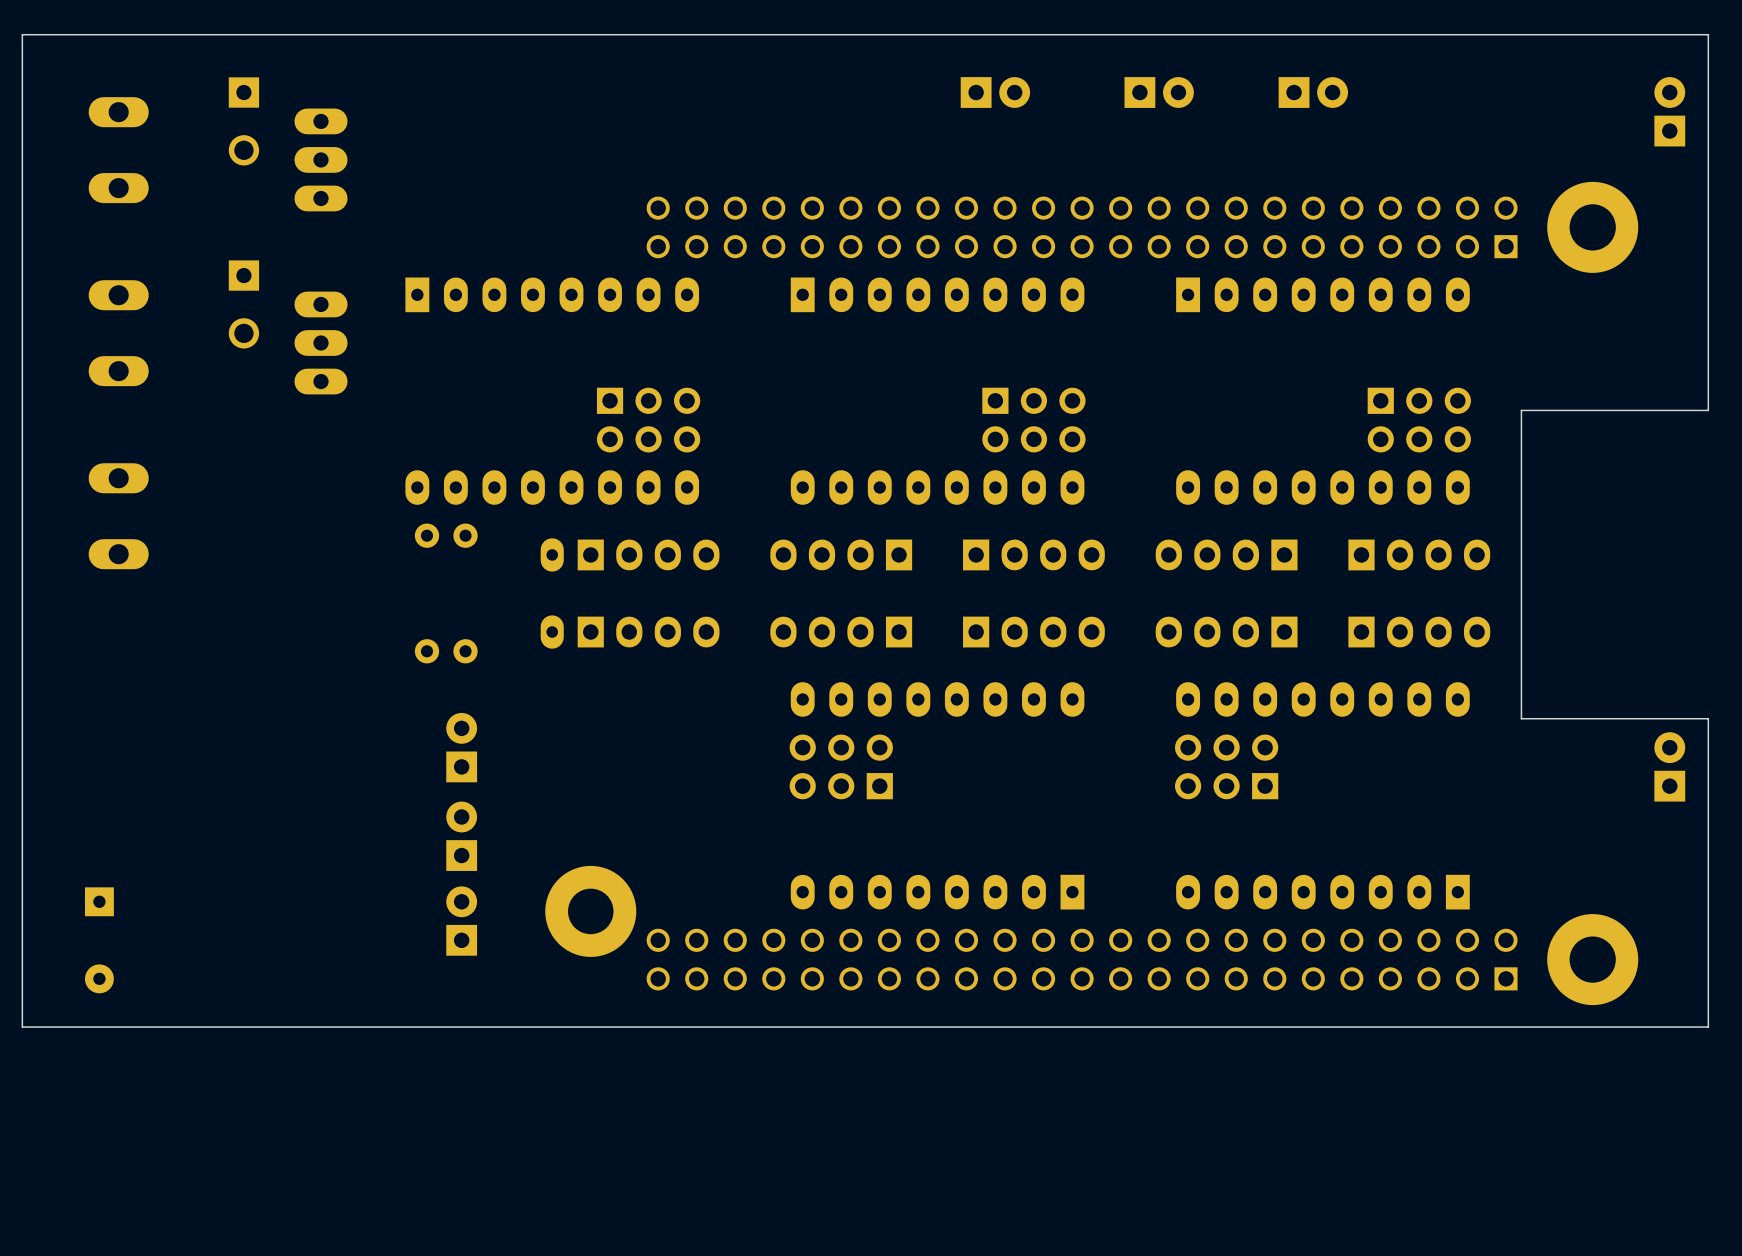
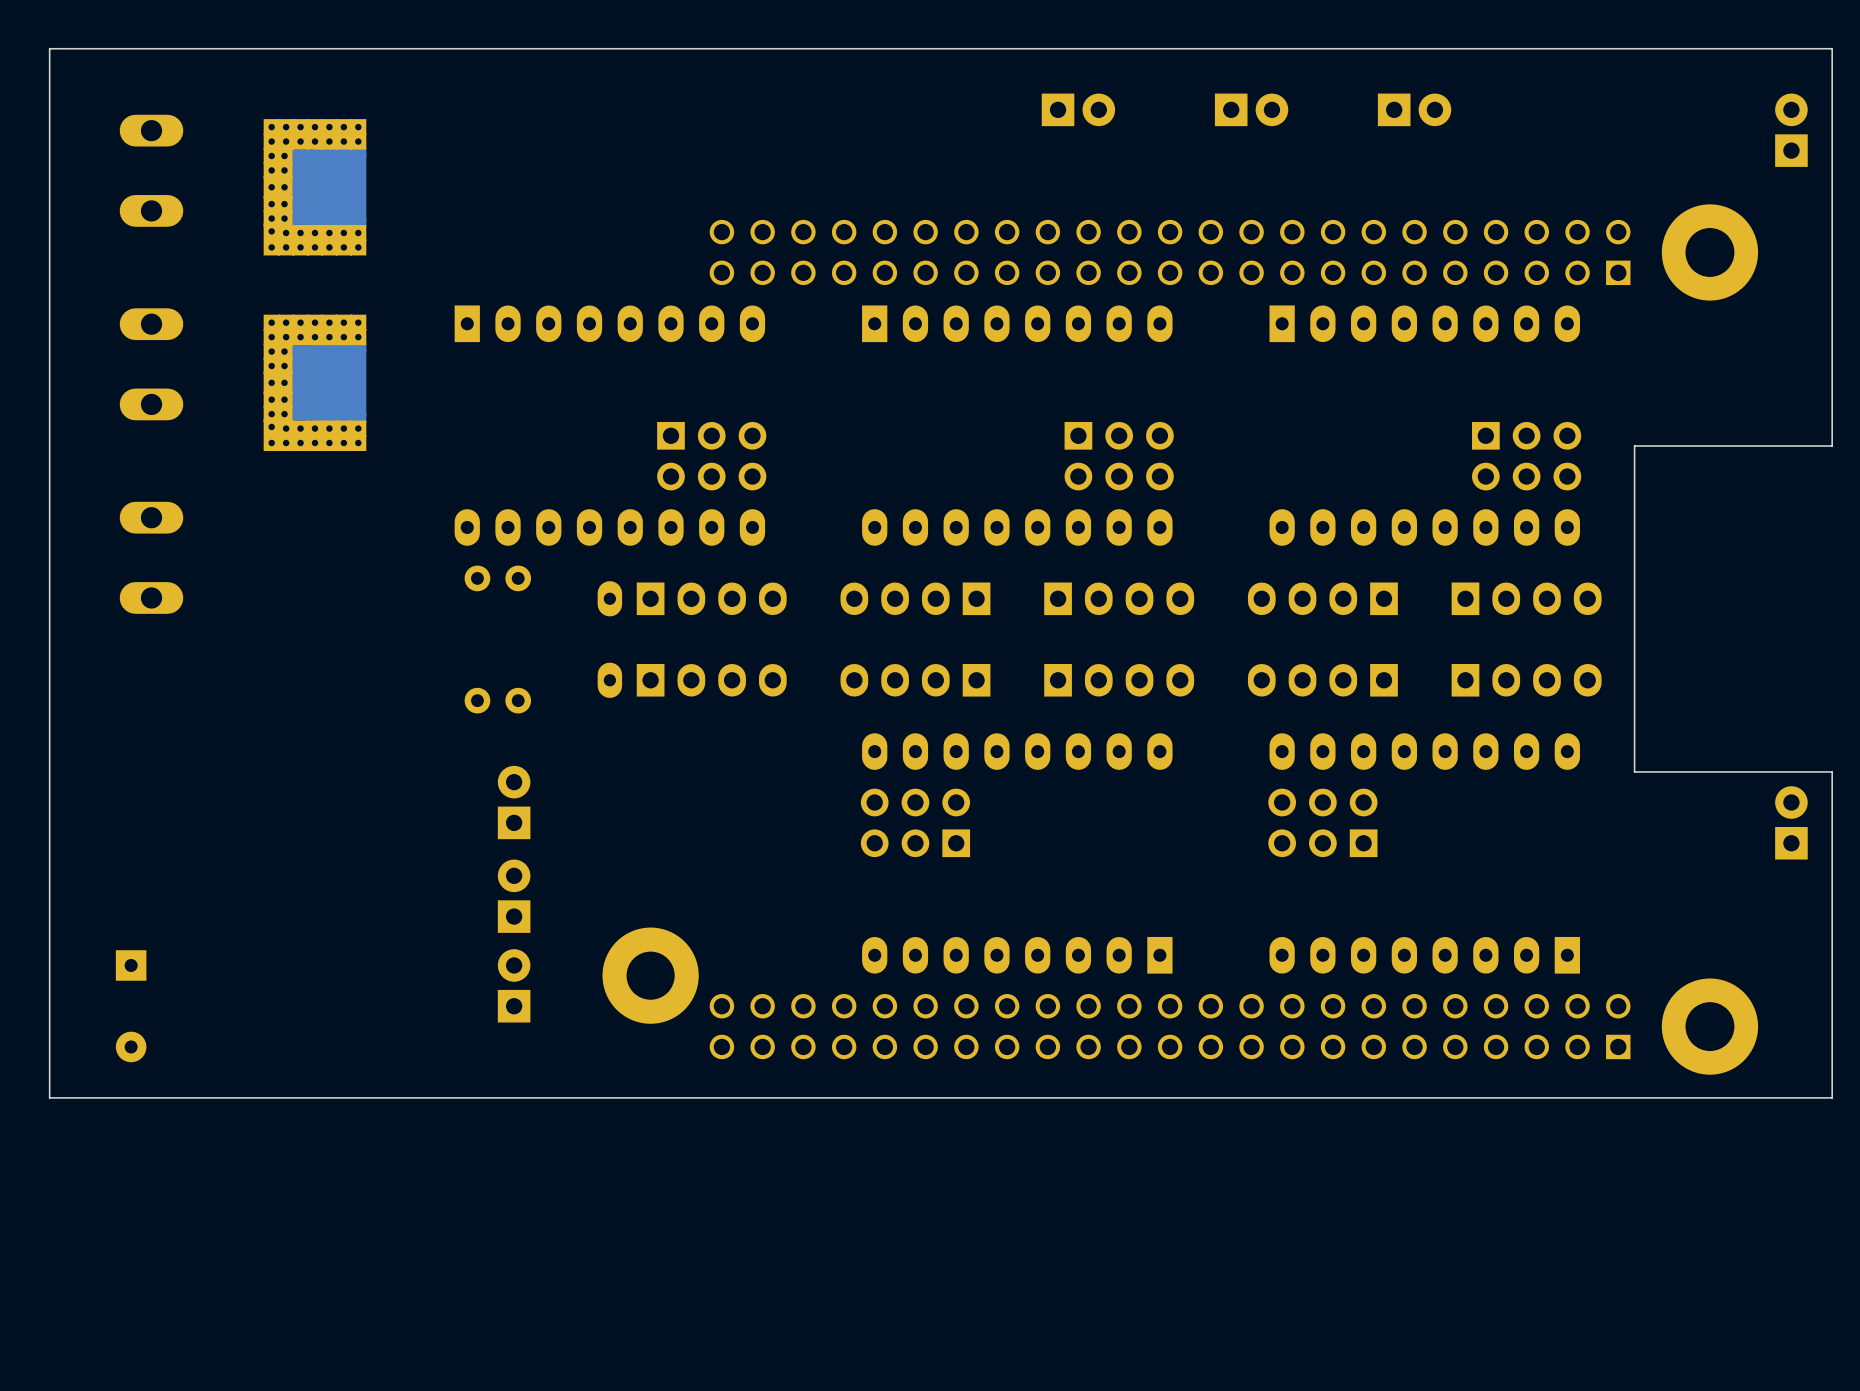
part: (243, 121) -> none
part: (321, 159) -> none
part: none -> (314, 187)
part: (243, 304) -> none
part: (321, 343) -> none
part: none -> (314, 382)

